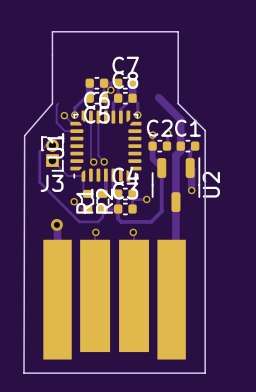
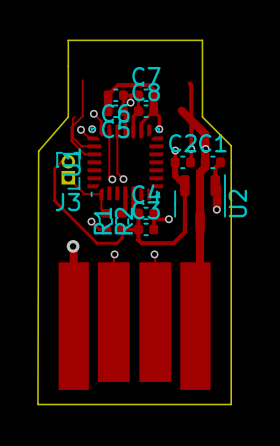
track: none -> (82, 80) (82, 116) (71, 127) (71, 140) (84, 154) (94, 154)
track: none -> (189, 83) (191, 85) (191, 148)
track: (89, 93) (74, 108) (74, 115) -> (108, 105) (108, 95) (118, 85) (148, 85) (153, 90) (153, 95)
track: none -> (93, 113) (101, 121) (101, 130)
via: none -> (93, 113)
via: none -> (205, 148)

